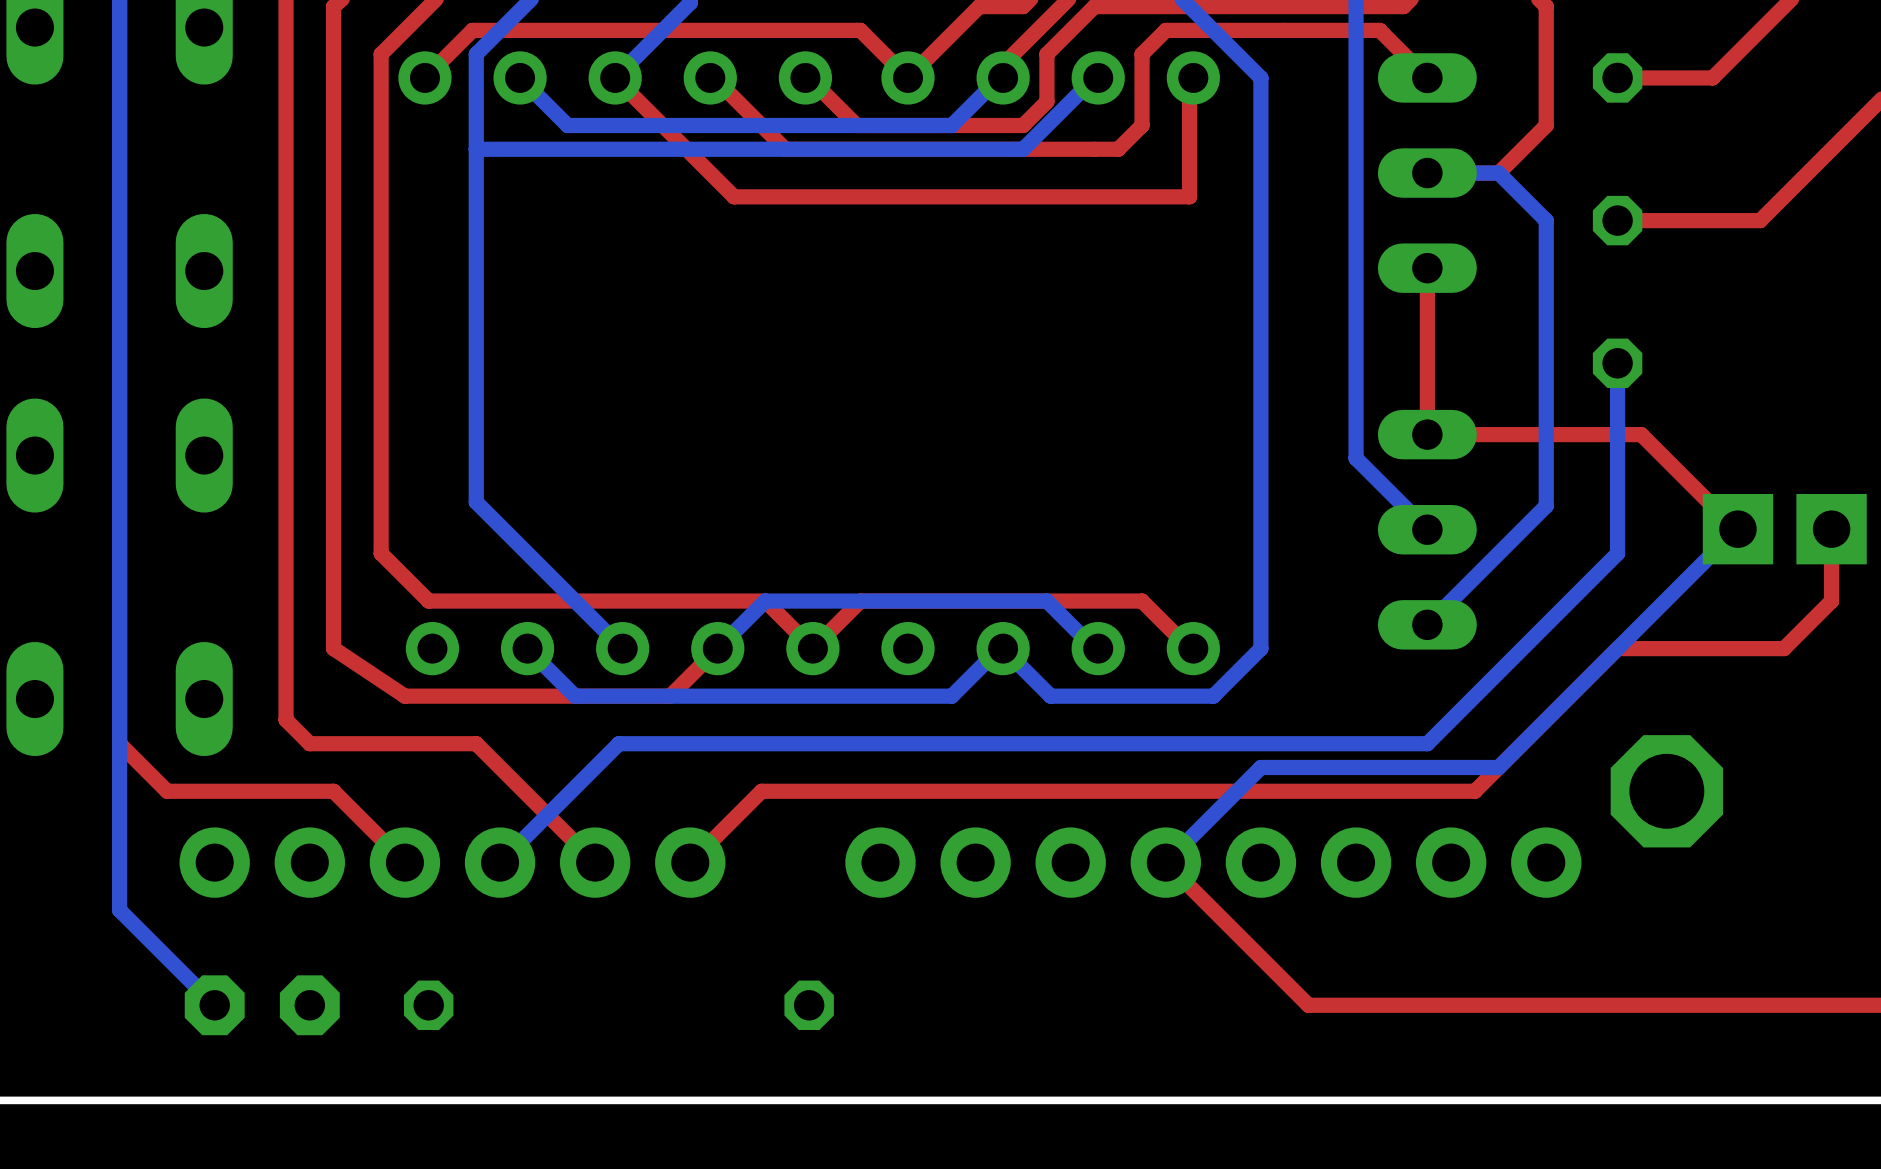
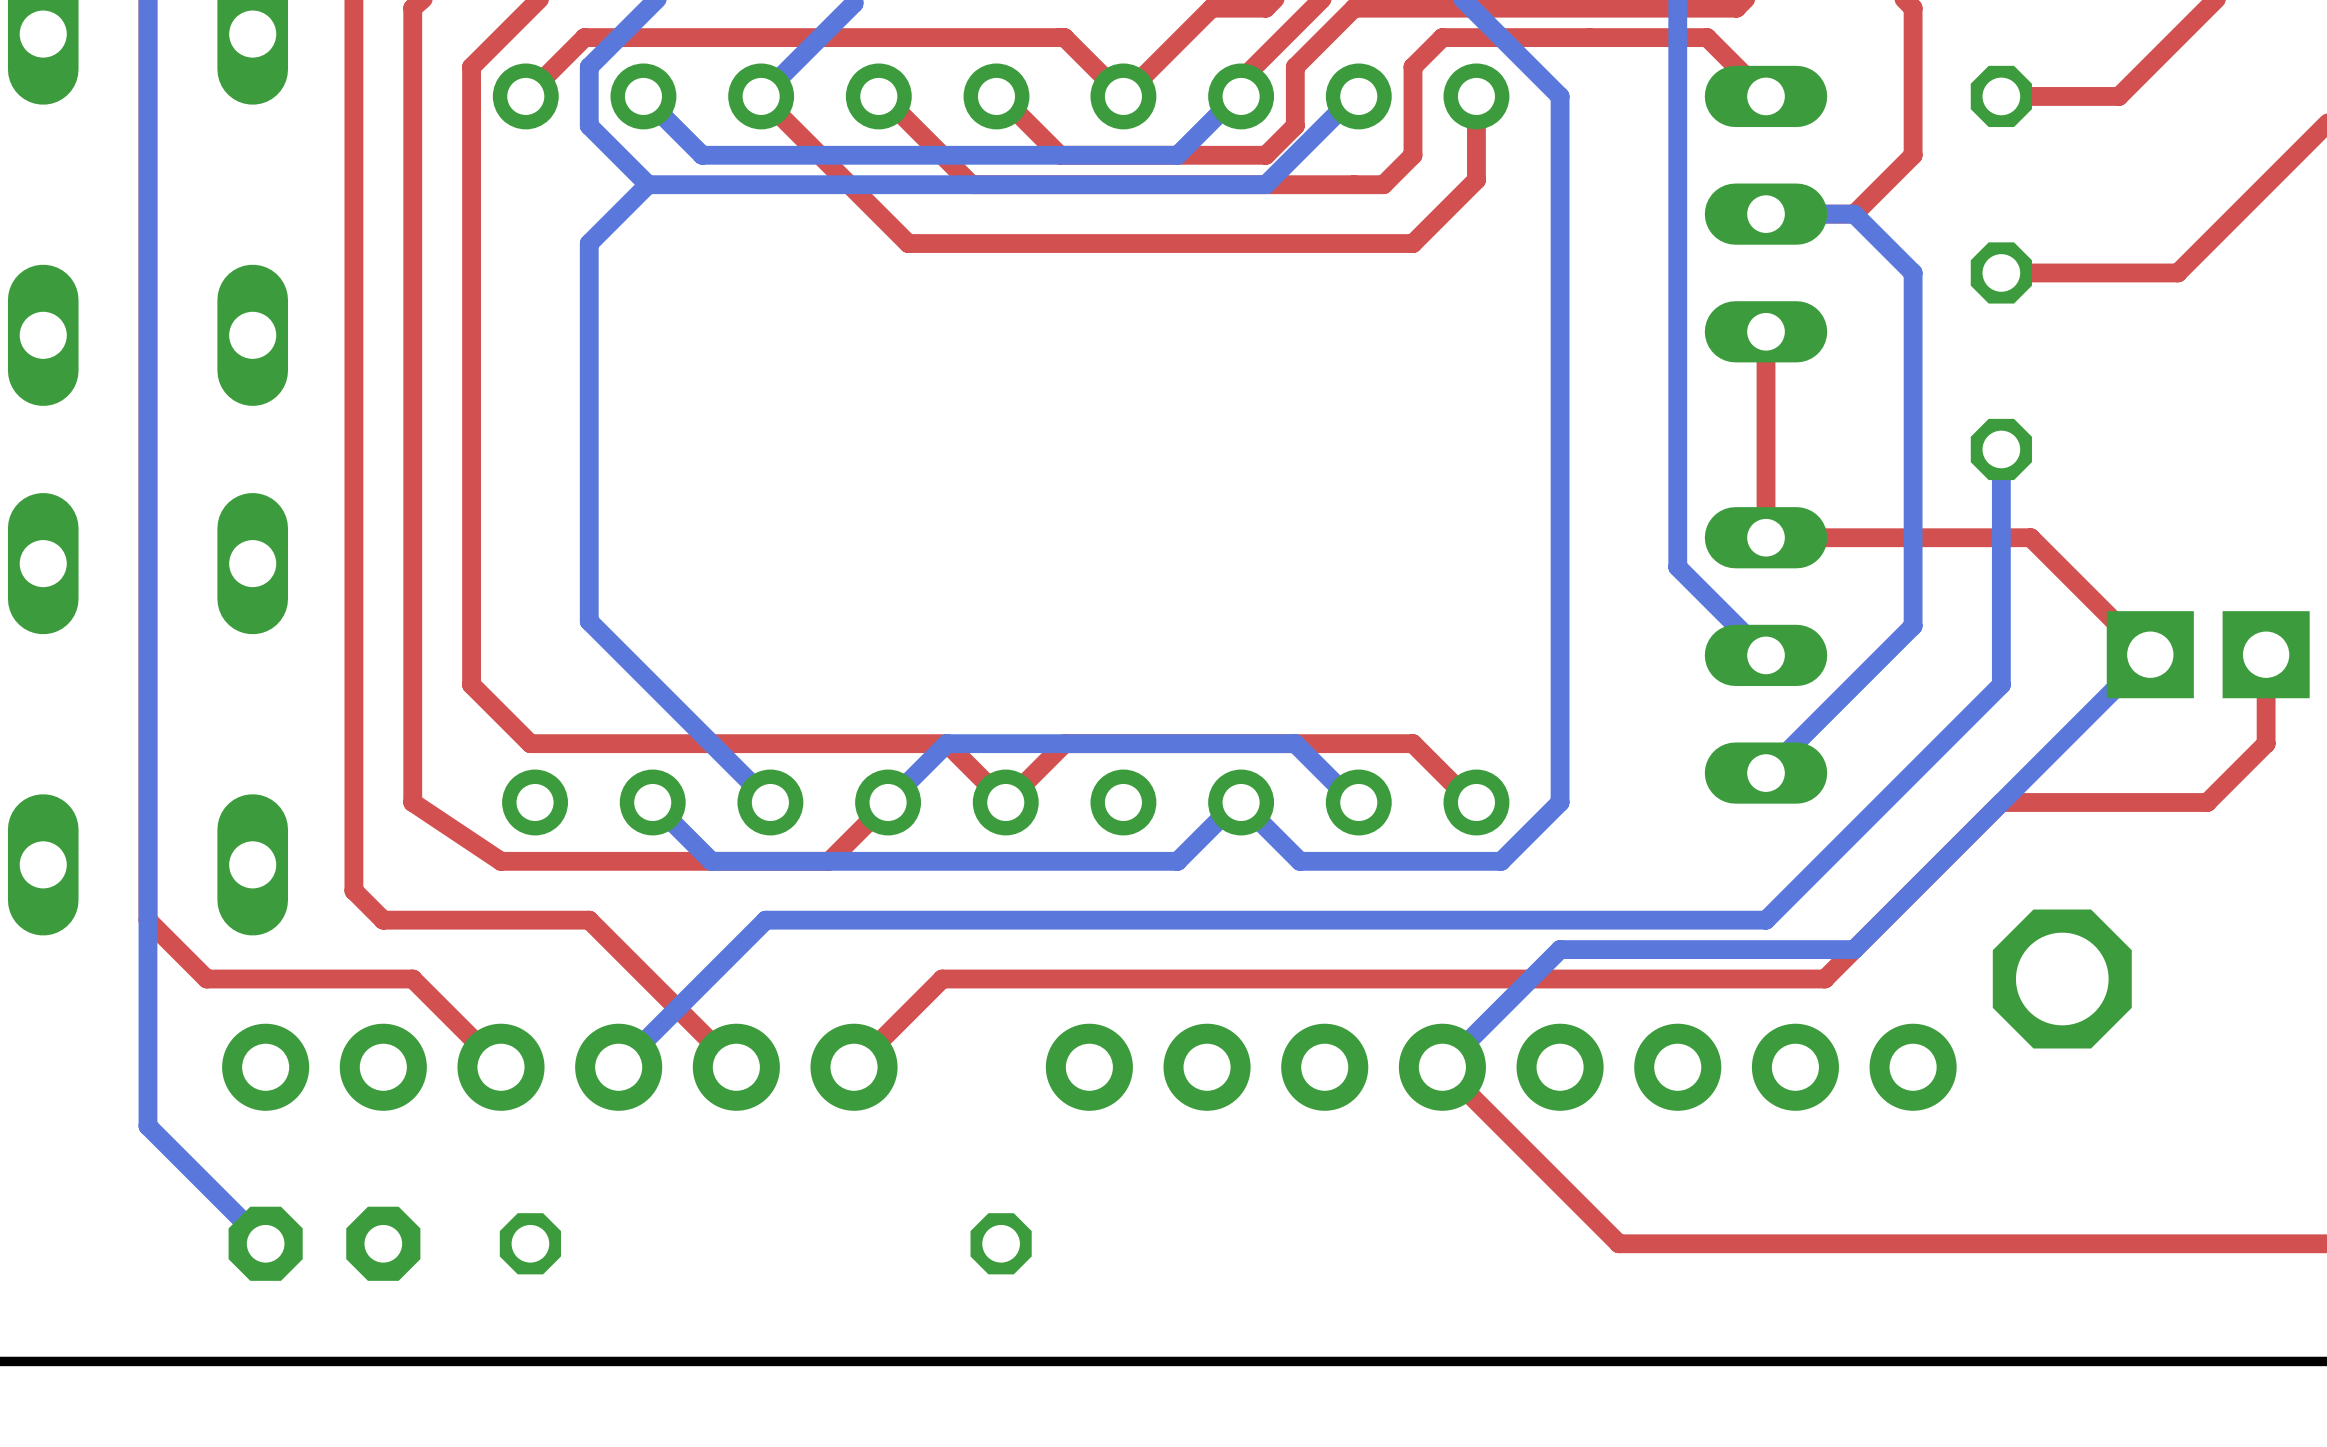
top track: (1193, 77) (1189, 77) (1189, 196) (1142, 196) -> (1476, 96) (1476, 180) (1412, 243)
bottom track: (476, 101) (476, 196) -> (589, 125) (648, 184) (589, 243)
bottom track: (523, 149) (476, 149) -> none

